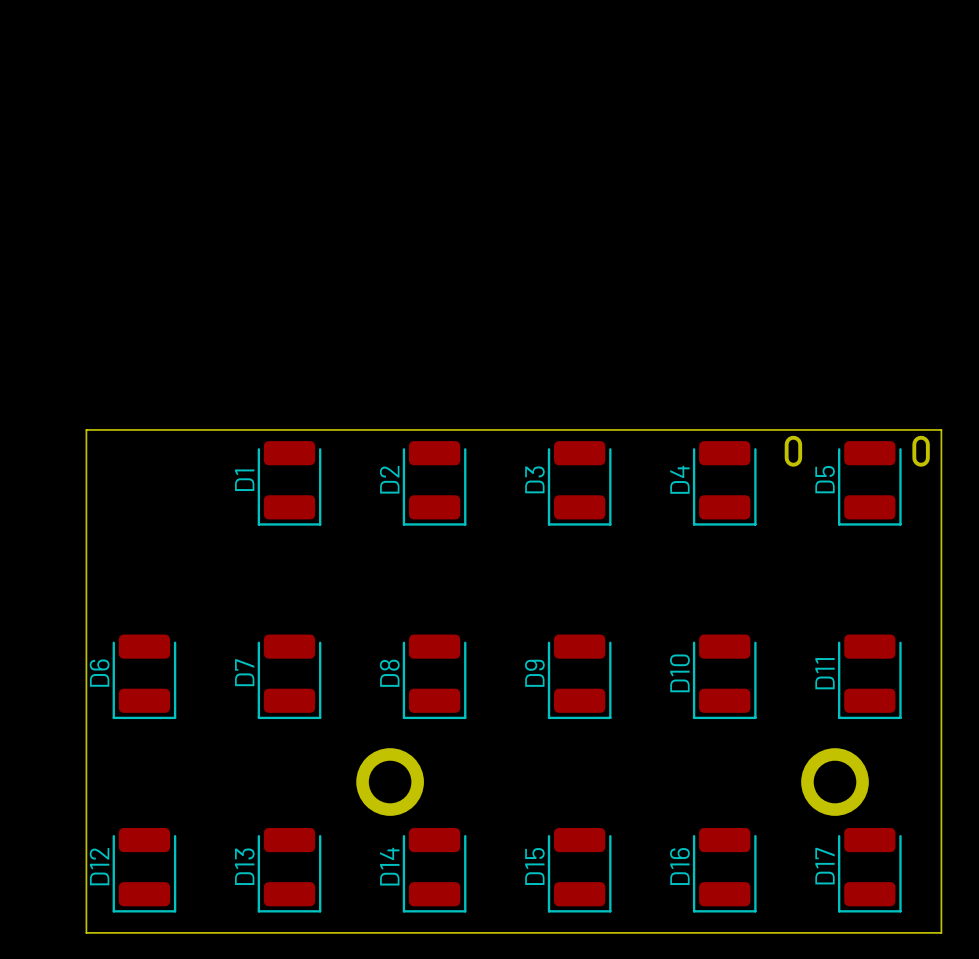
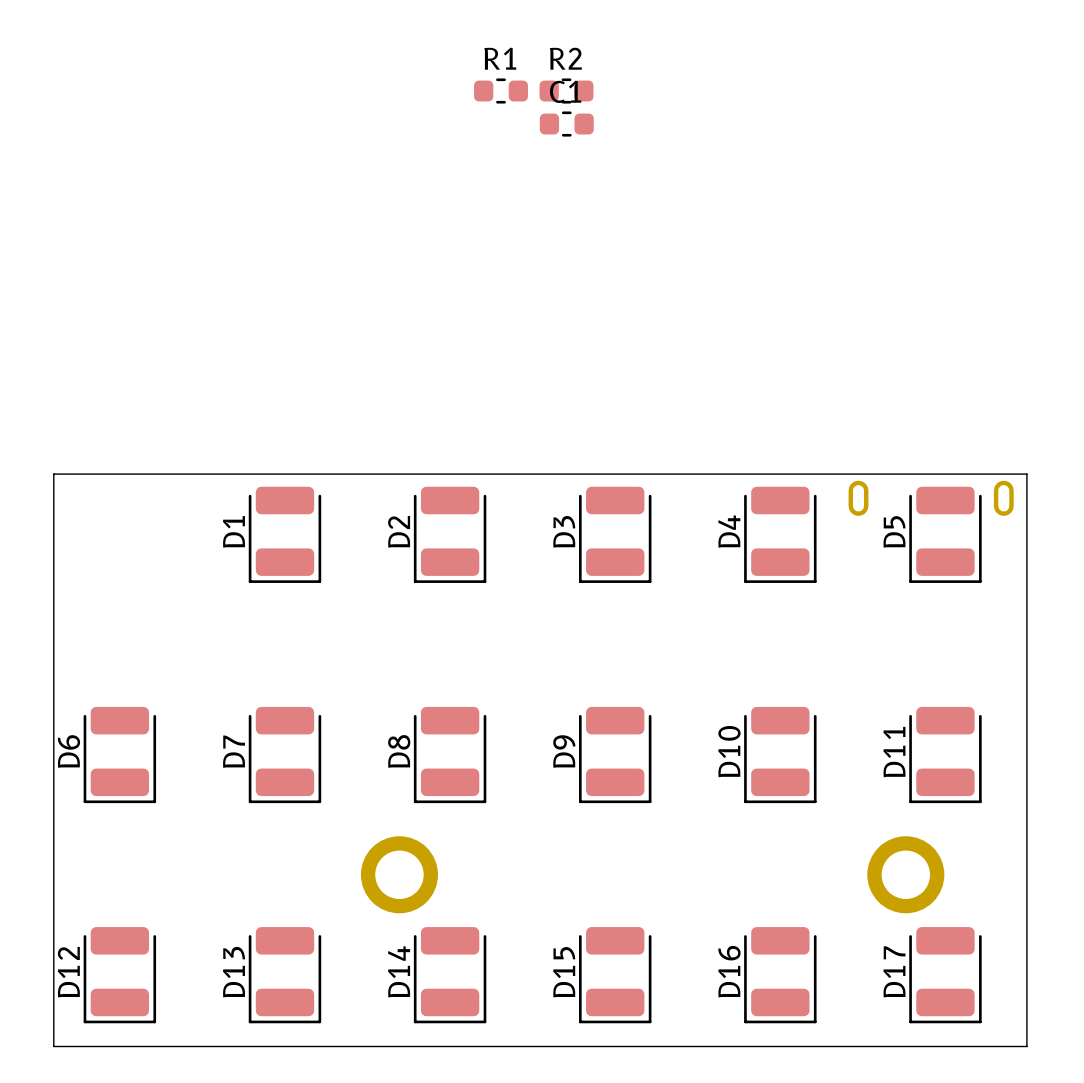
R1: none -> (501, 91)
R2: none -> (566, 91)
C1: none -> (566, 124)

